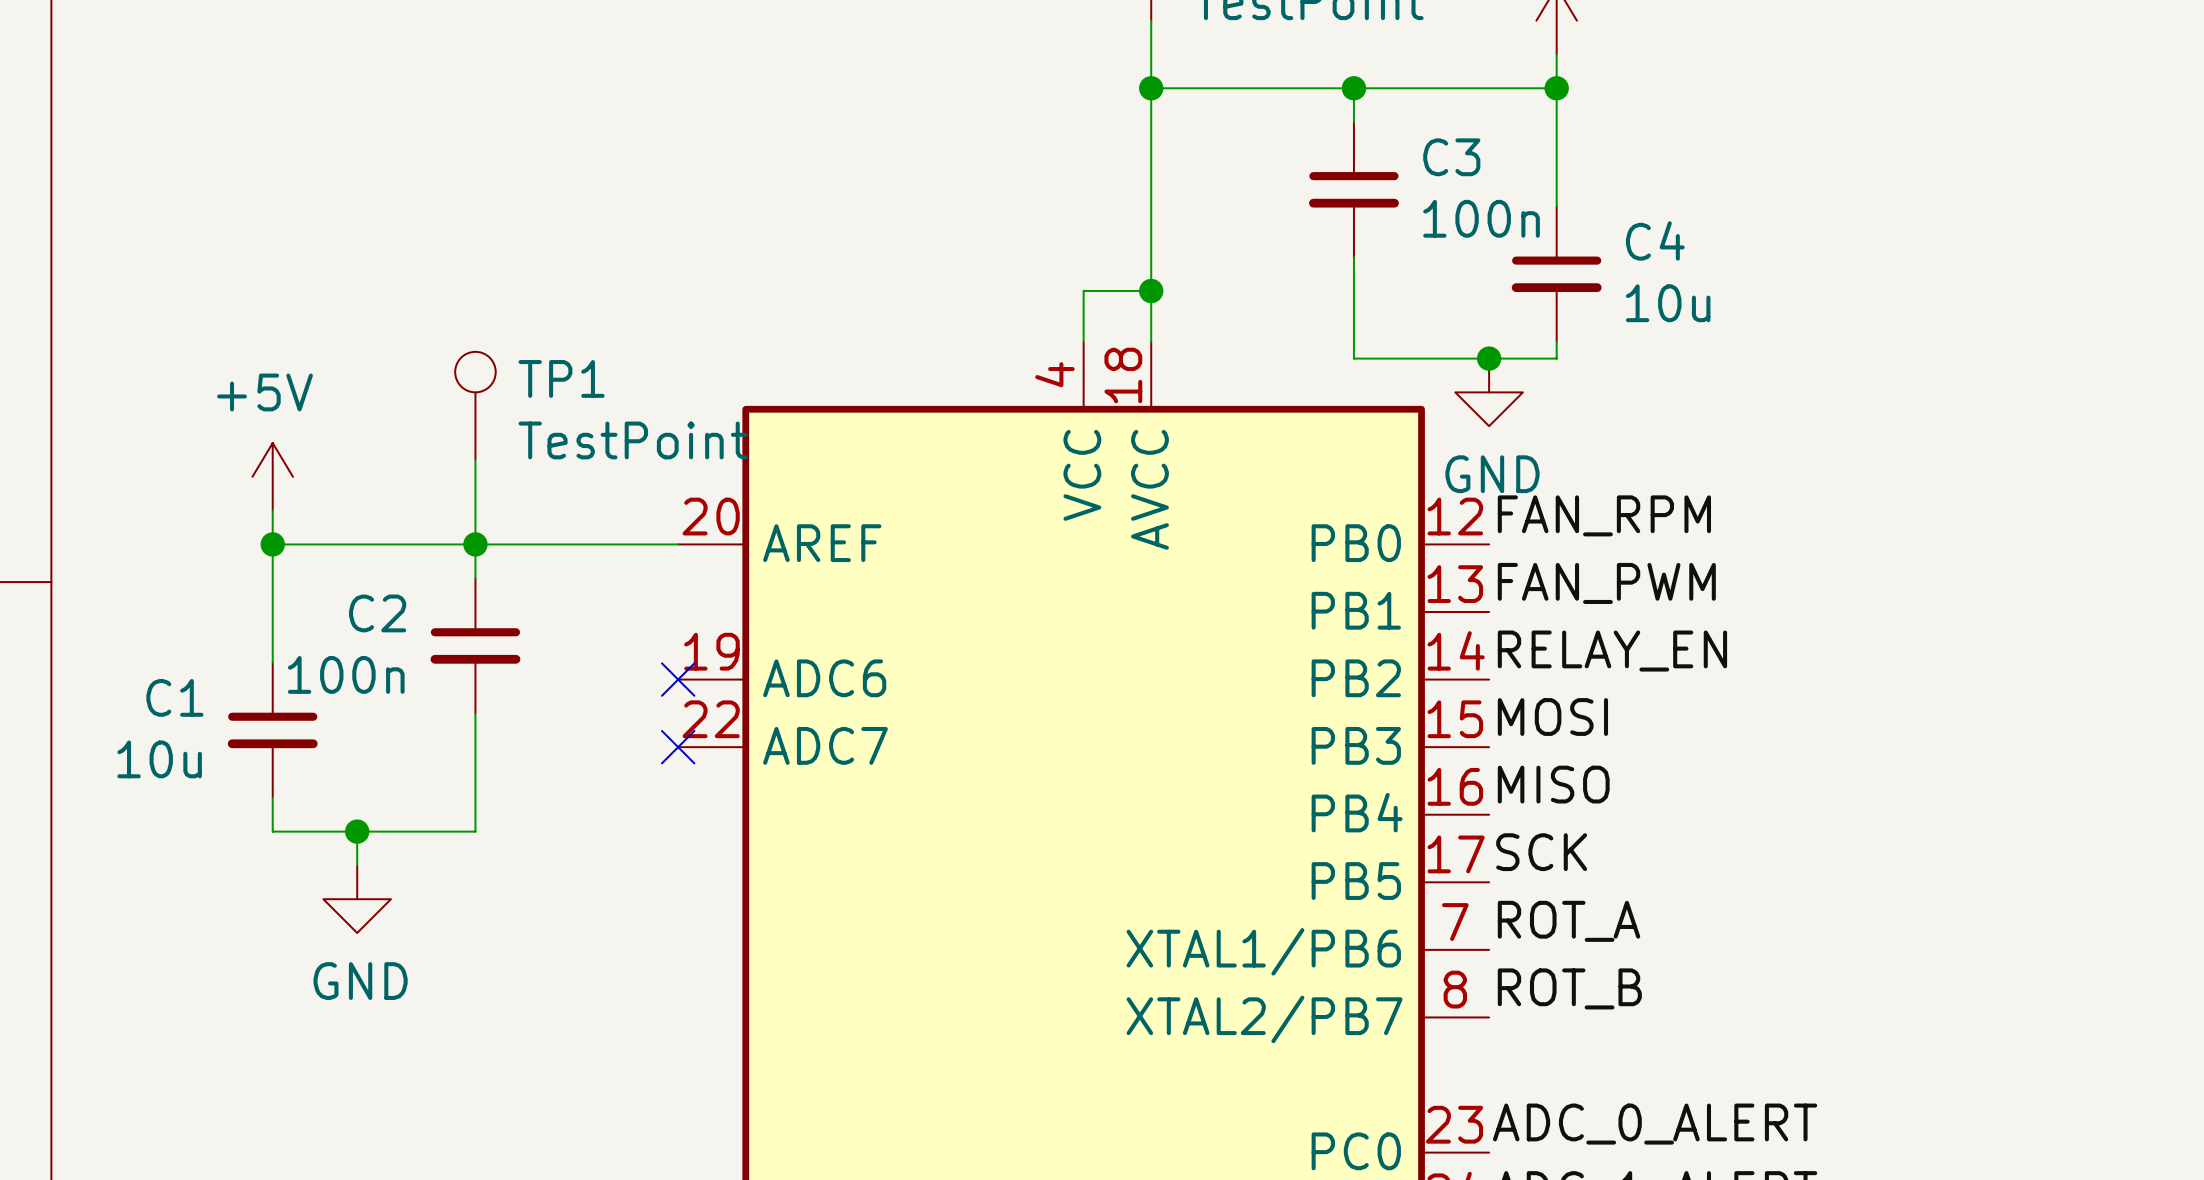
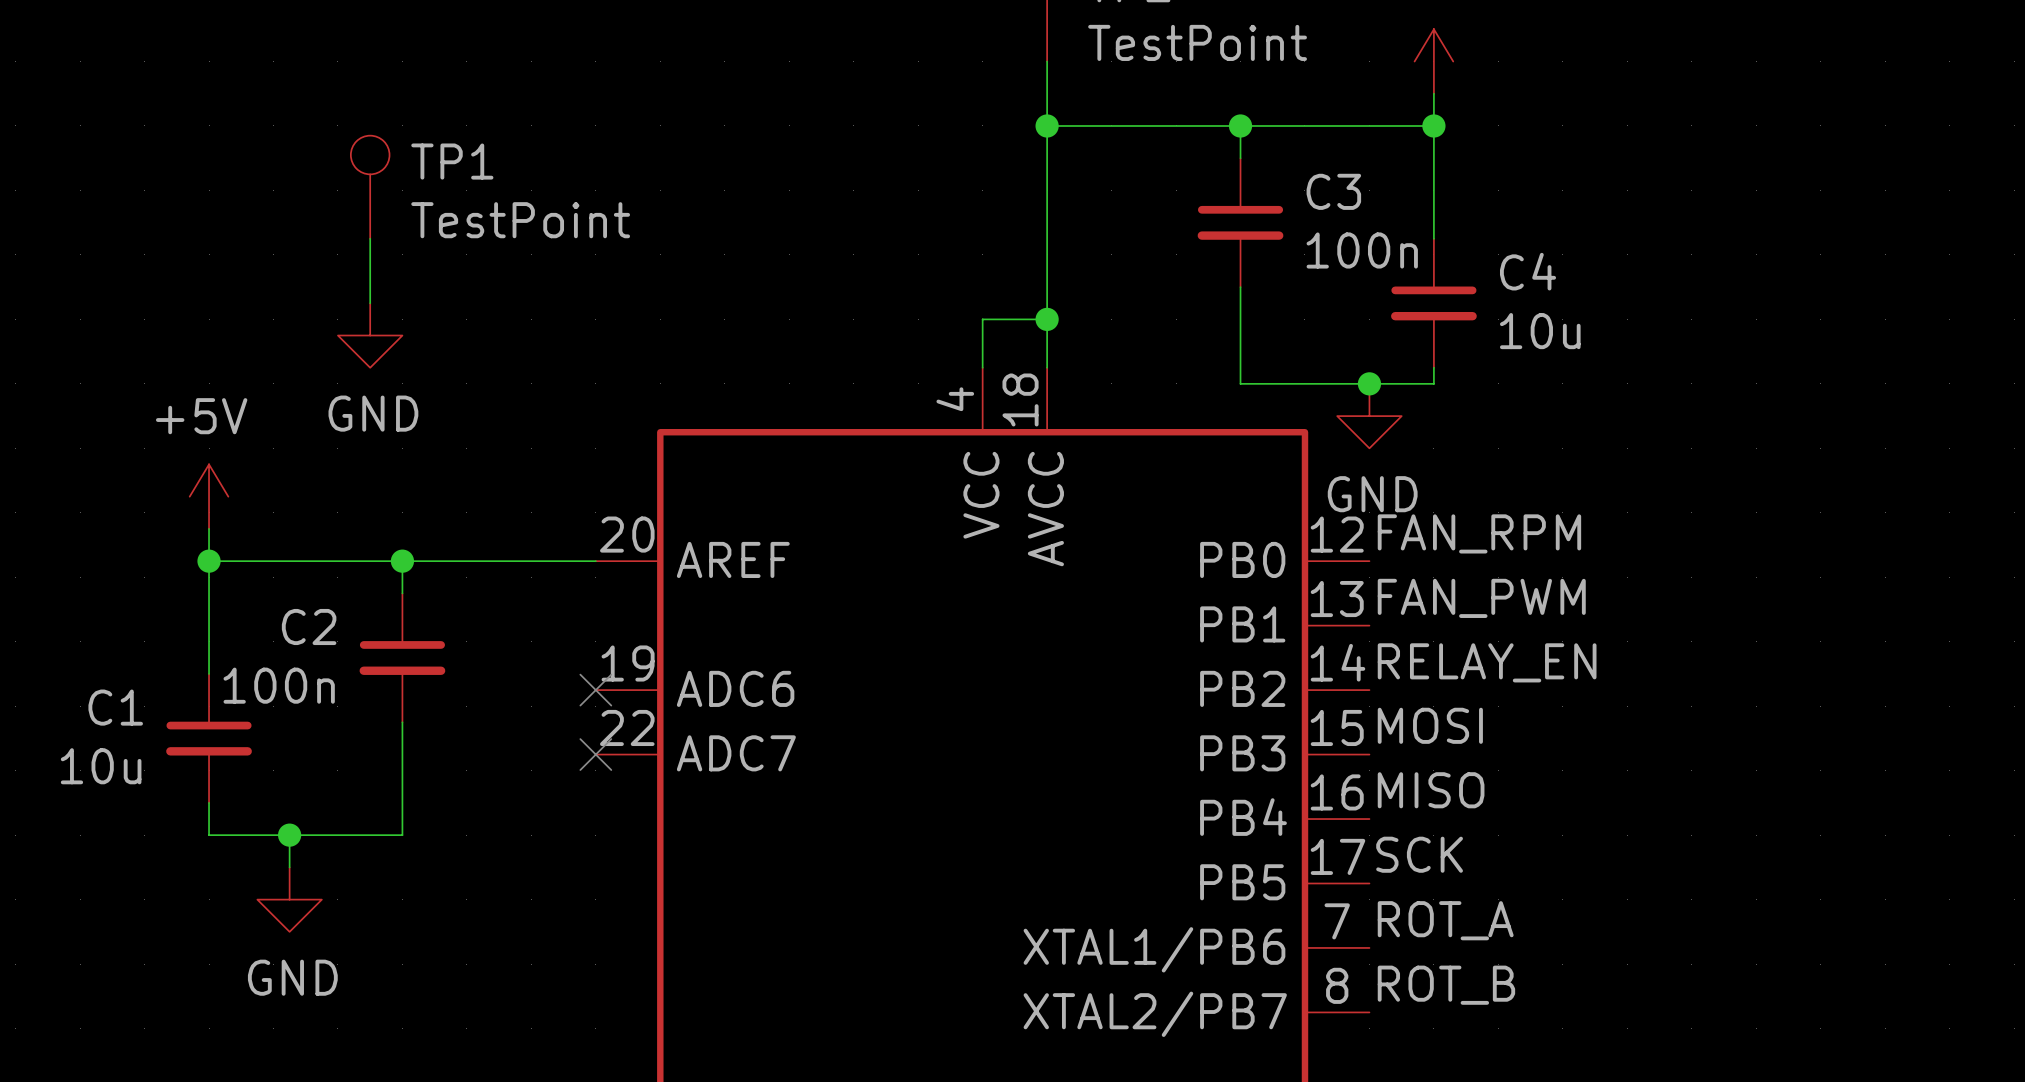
wire: none -> (370, 238) (370, 303)
power symbol: none -> GND (370, 335)
TP1 position: (475, 405) -> (370, 187)
wire: (475, 459) (475, 544) -> none

